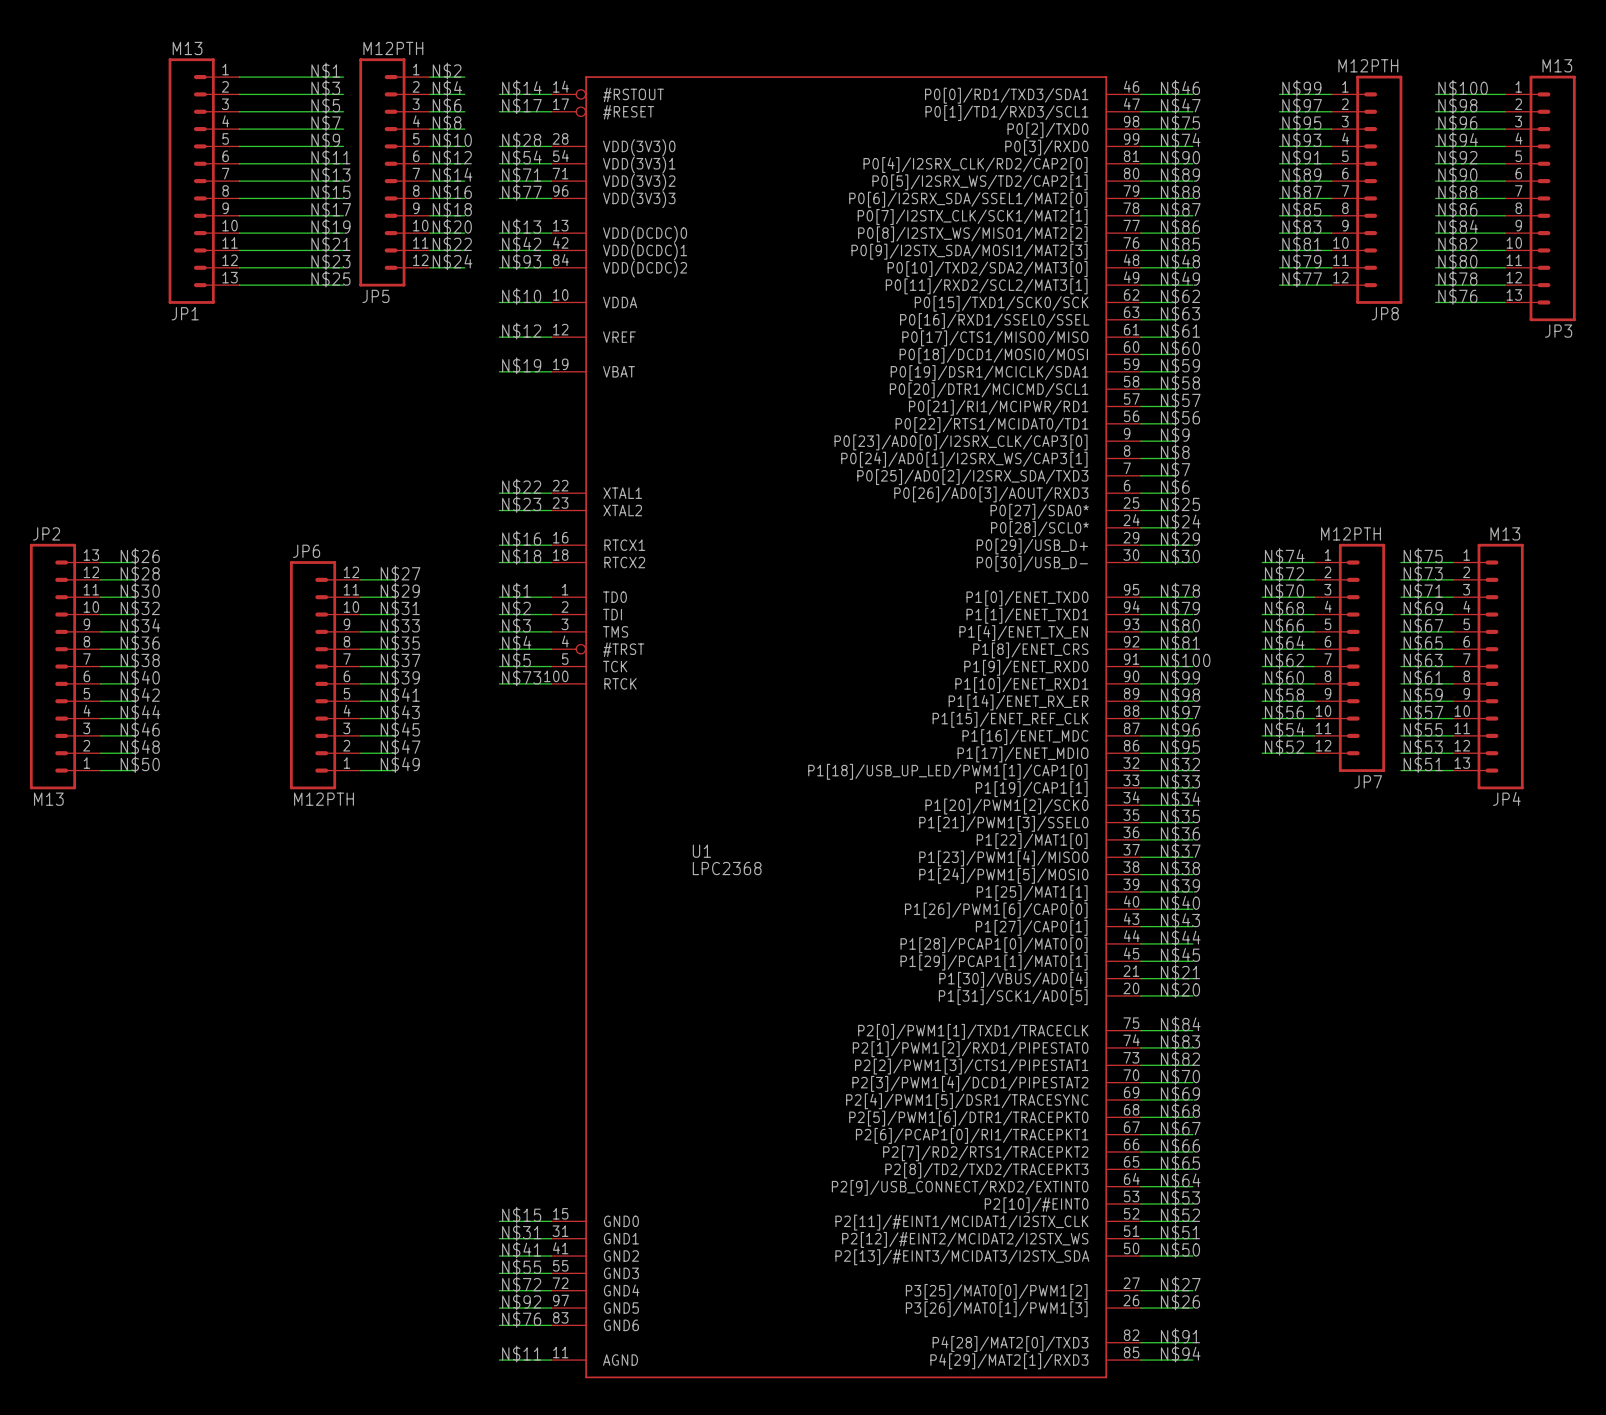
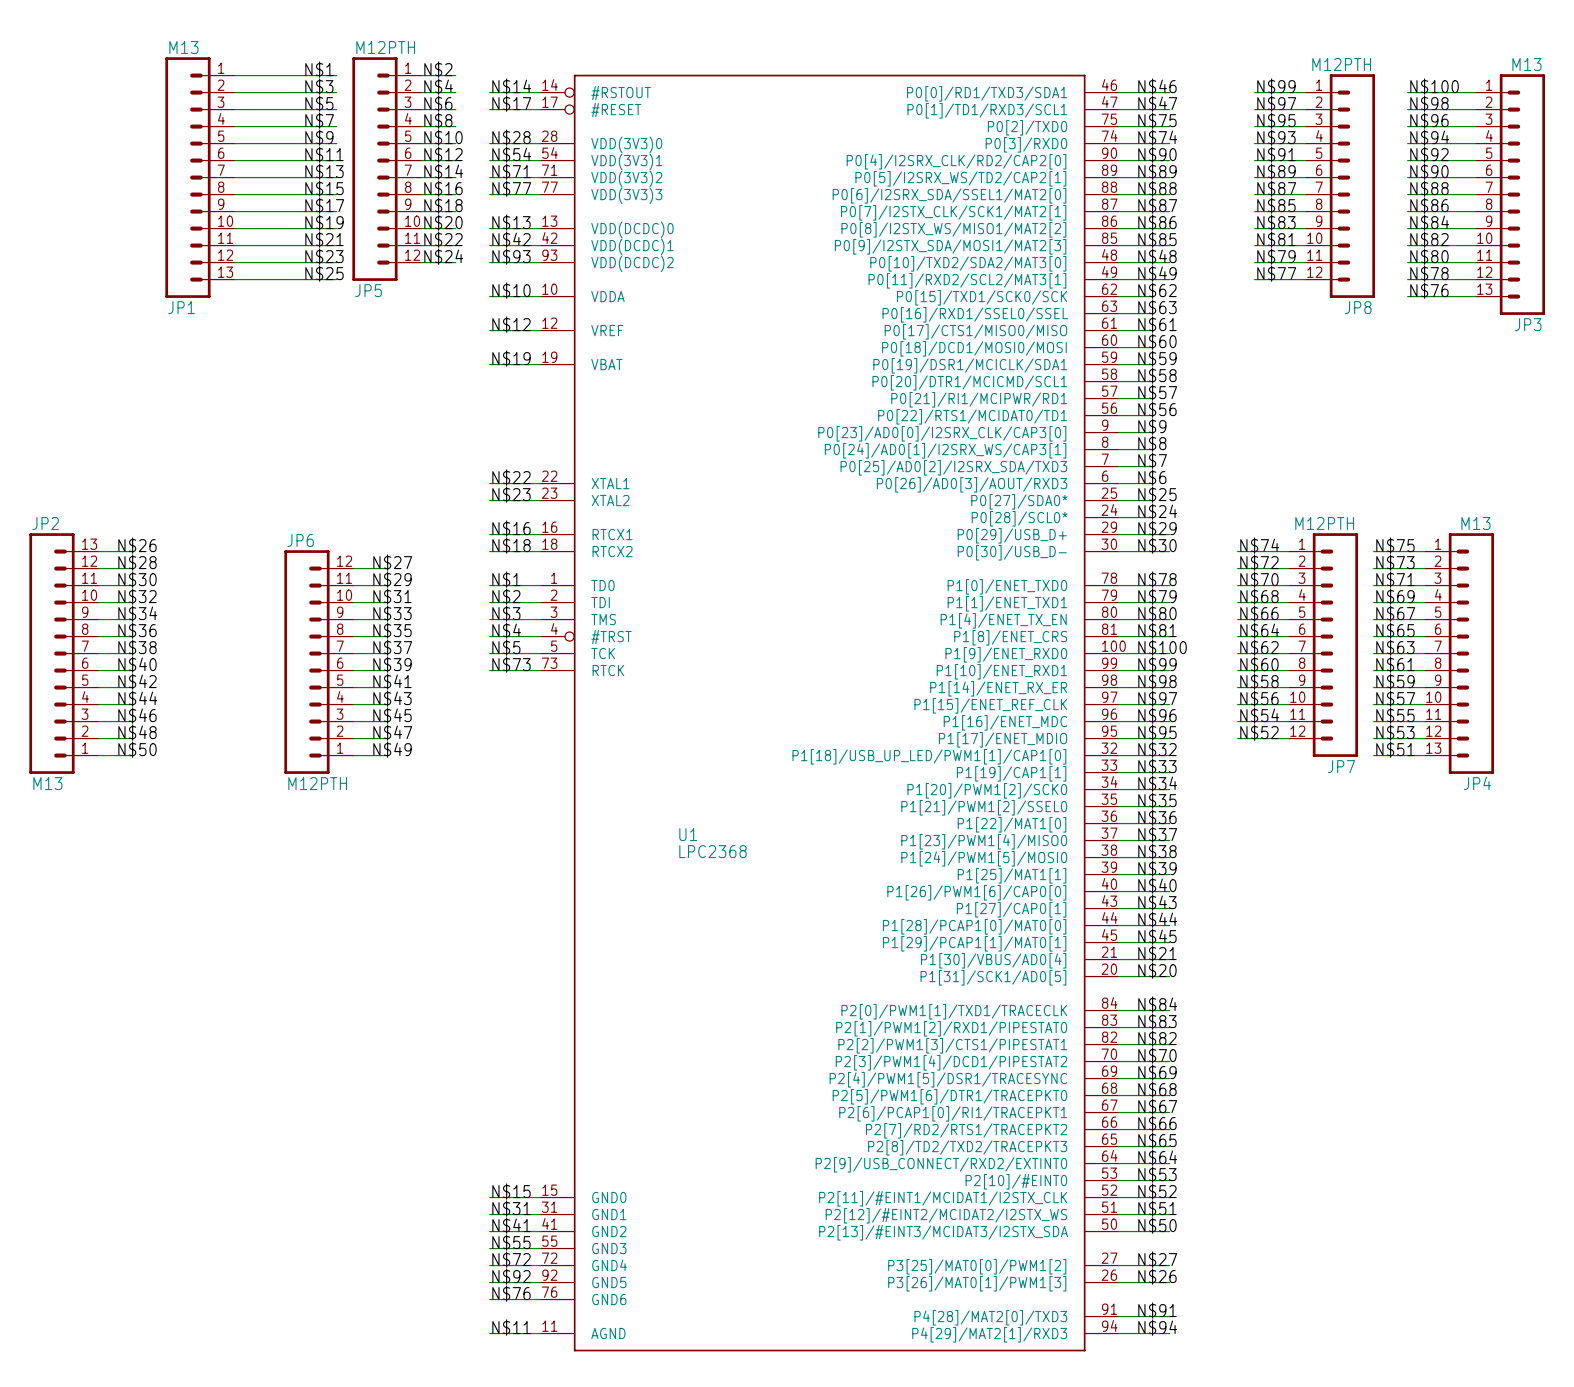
U1 symbol: [551, 76, 1141, 1379] -> [540, 74, 1119, 1352]

